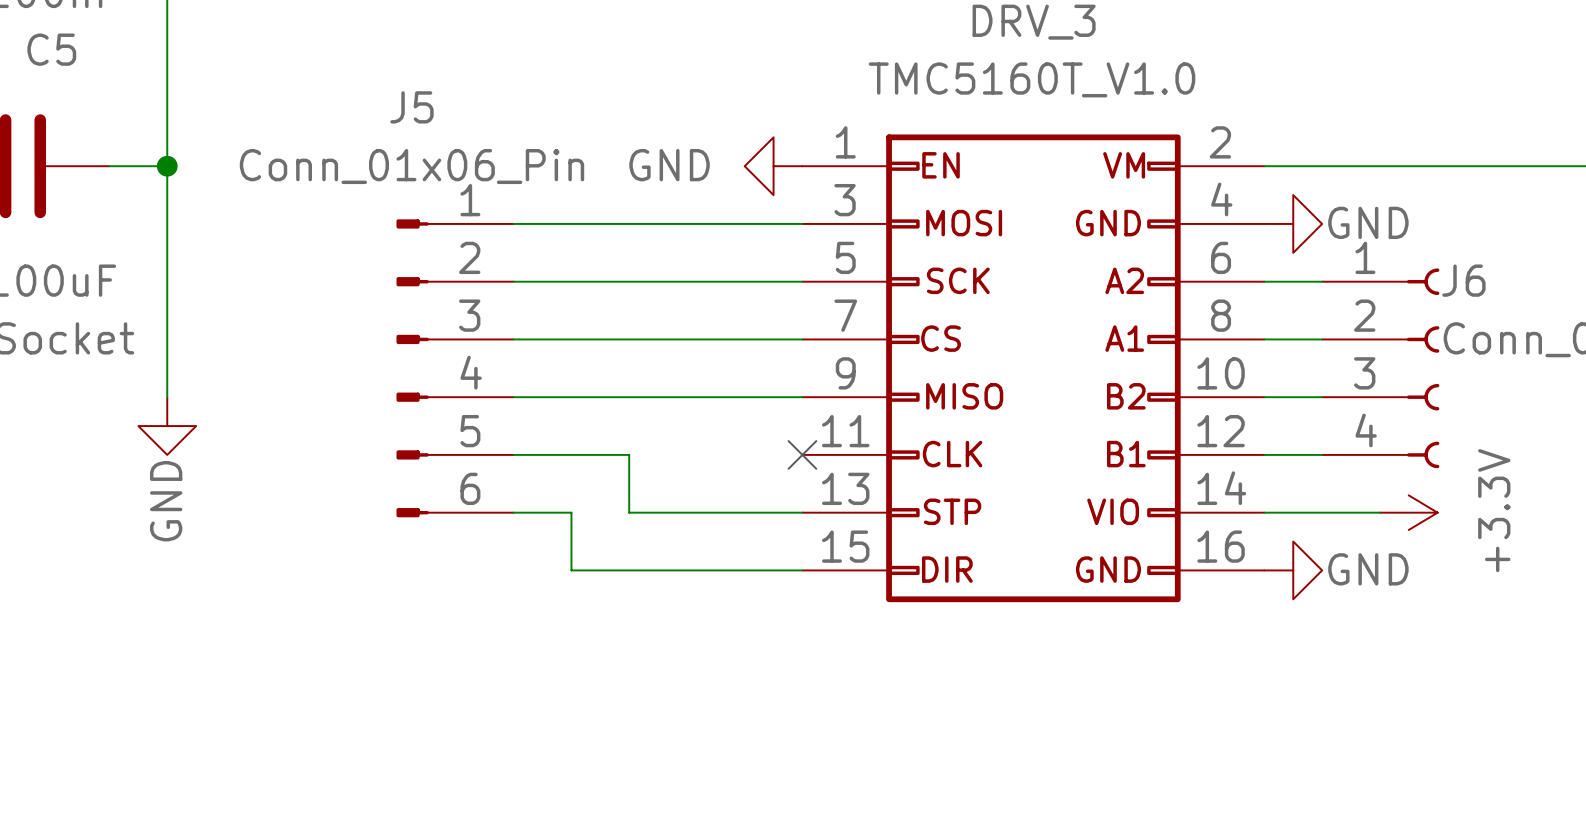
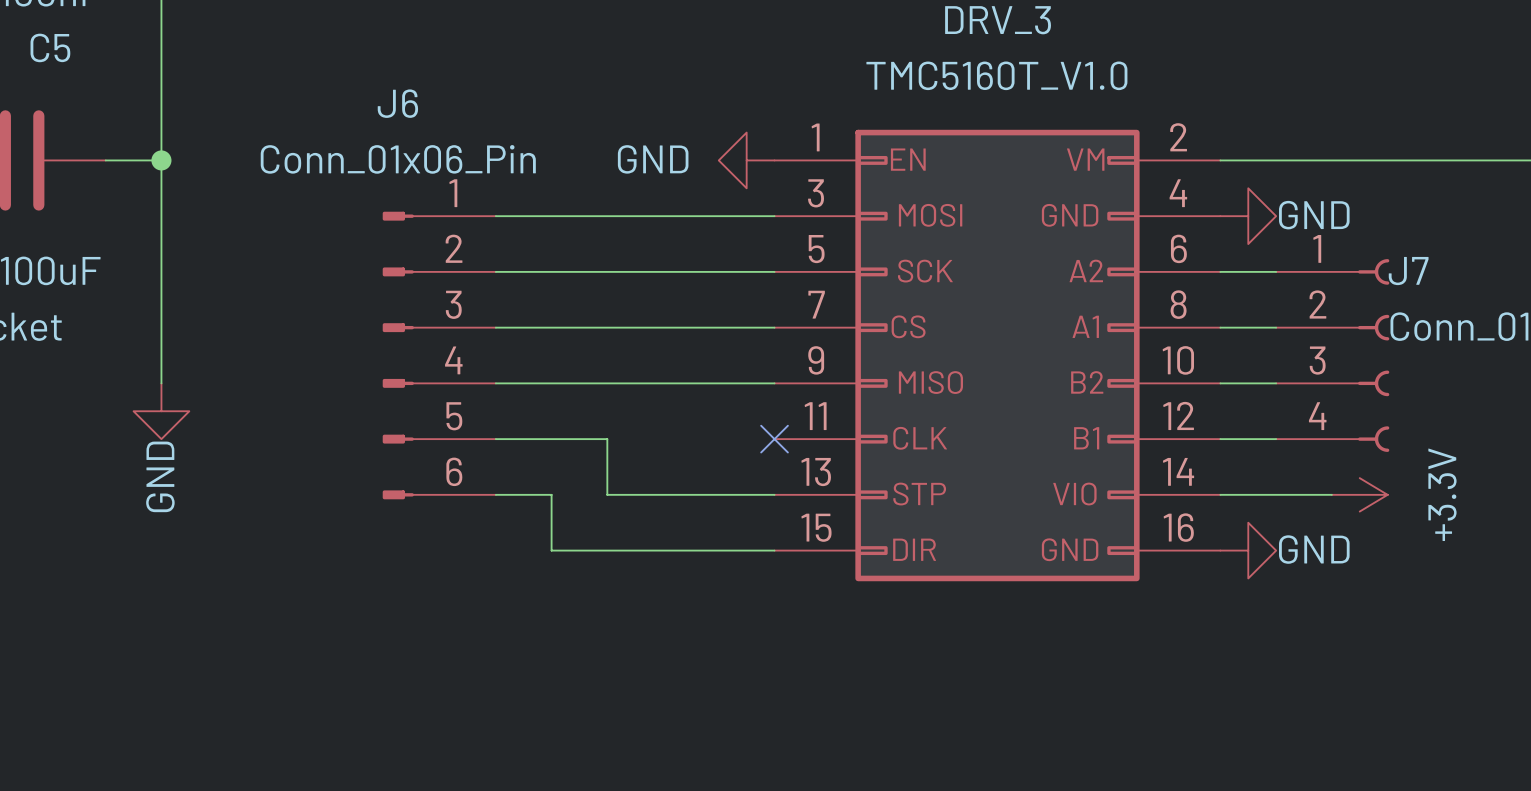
J5 name: J5 (411, 107) -> J6 (397, 103)
J6 name: J6 (1463, 280) -> J7 (1408, 271)

